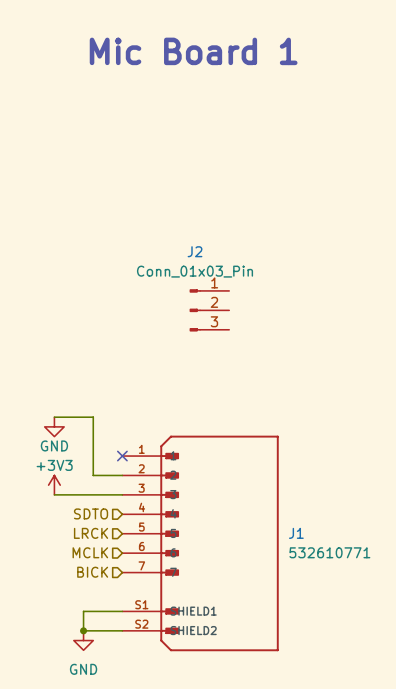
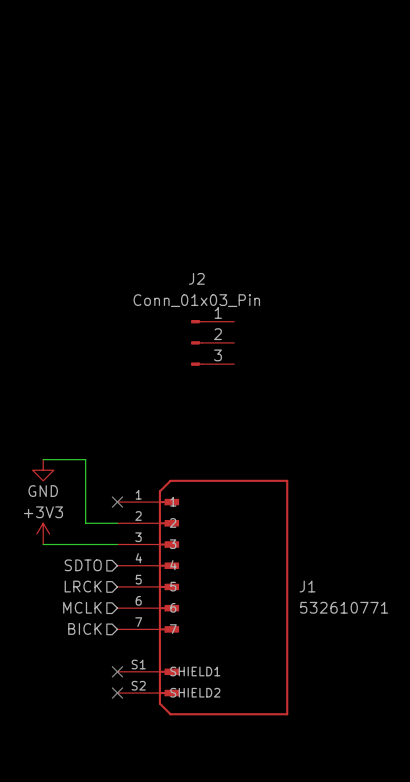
text: Mic Board 1 (193, 51) -> none
wire: (122, 611) (83, 611) (83, 630) (122, 630) -> none
no-connect mark: none -> (117, 671)
junction: (83, 630) -> none
no-connect mark: none -> (117, 693)
power symbol: GND (83, 640) -> none

